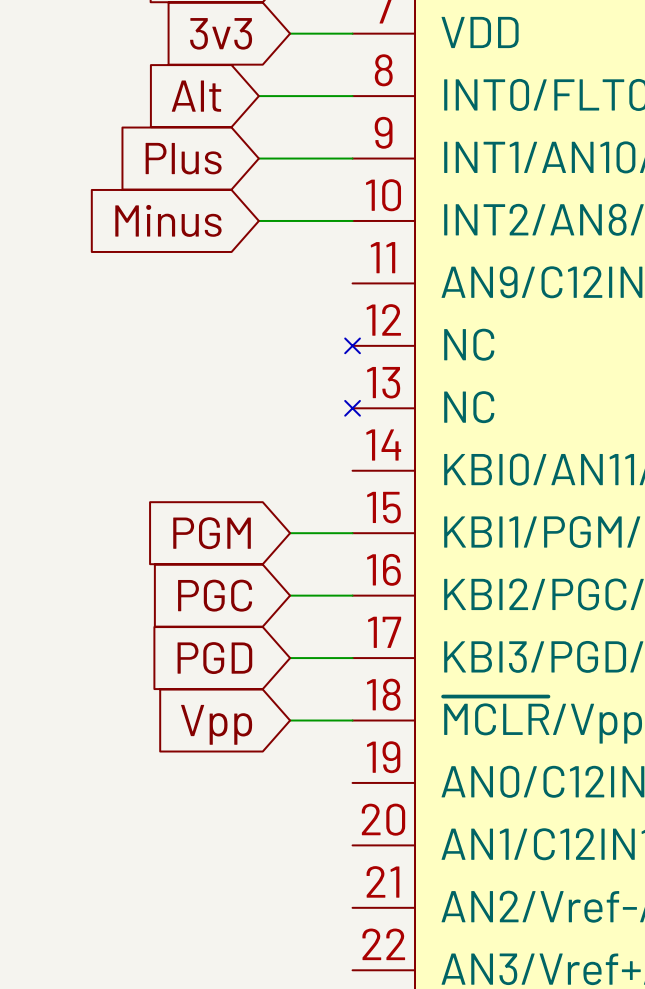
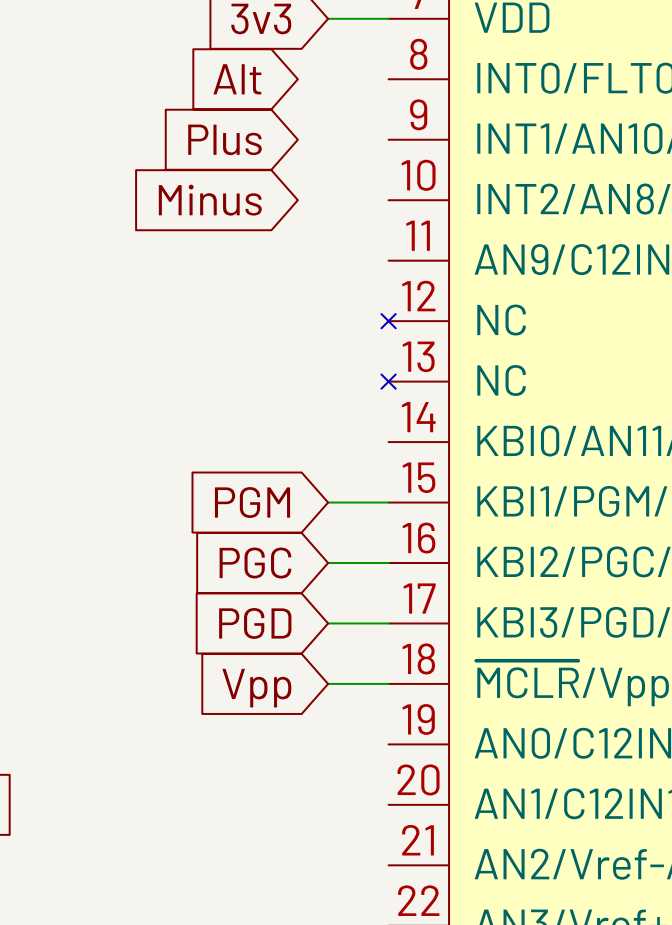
wire: (258, 96) (352, 96) -> none
wire: (258, 158) (352, 158) -> none
wire: (258, 220) (352, 220) -> none

